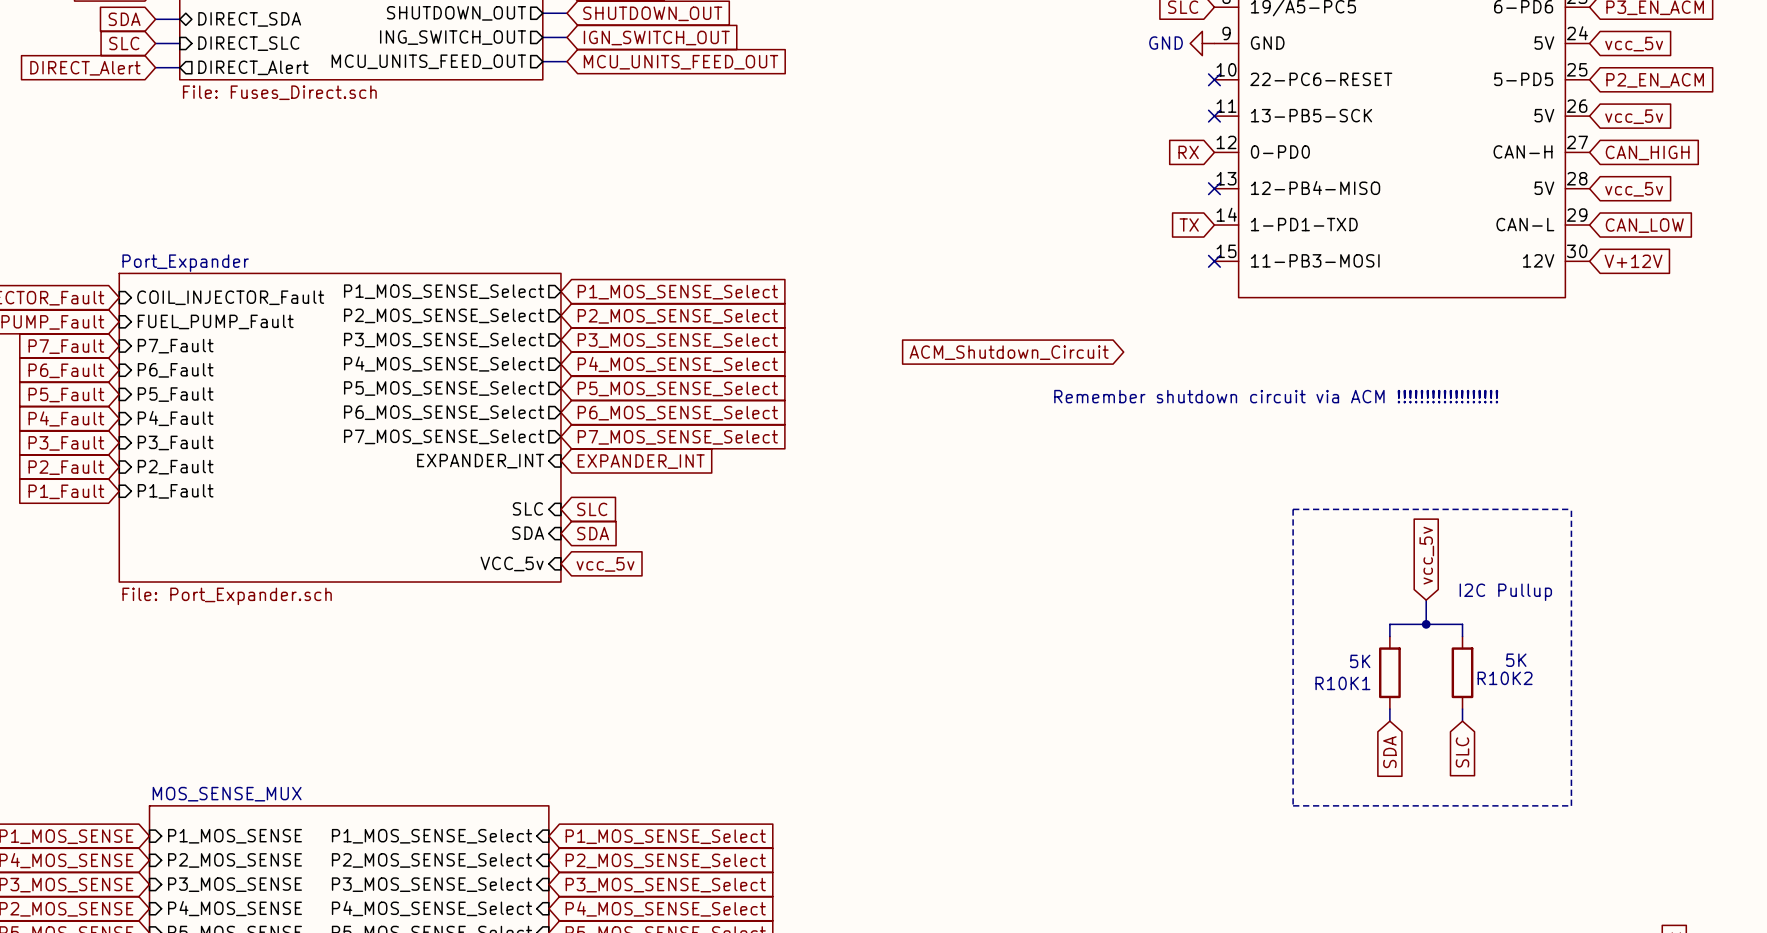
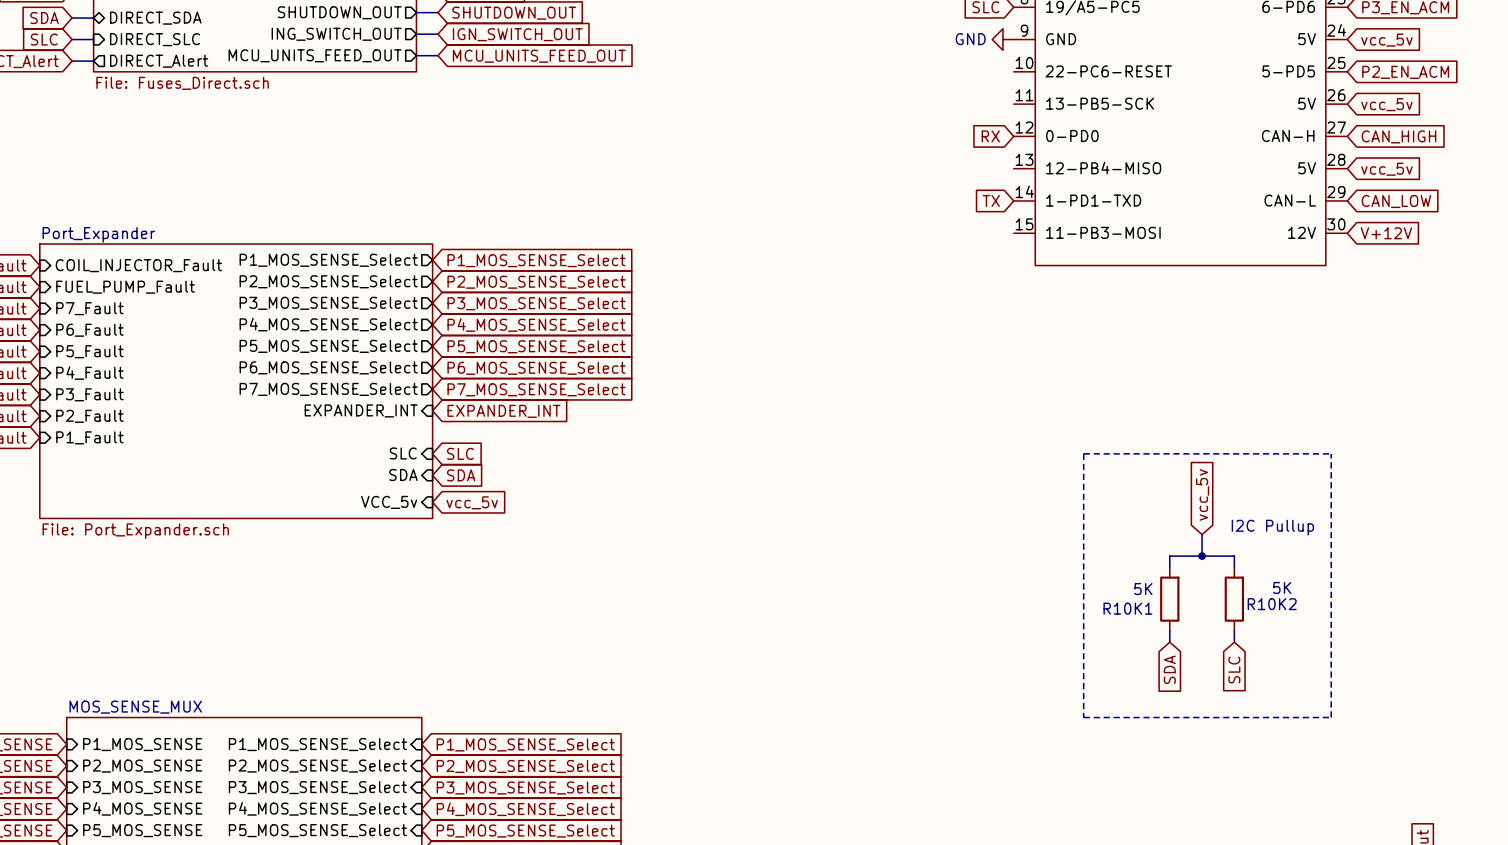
no-connect mark: (1214, 79) -> none
no-connect mark: (1214, 116) -> none
no-connect mark: (1214, 188) -> none
no-connect mark: (1214, 261) -> none
global label: ACM_Shutdown_Circuit (1009, 352) -> none
text: Remember shutdown circuit via ACM !!!!!!!!!!!!!!!!!! (1276, 396) -> none

